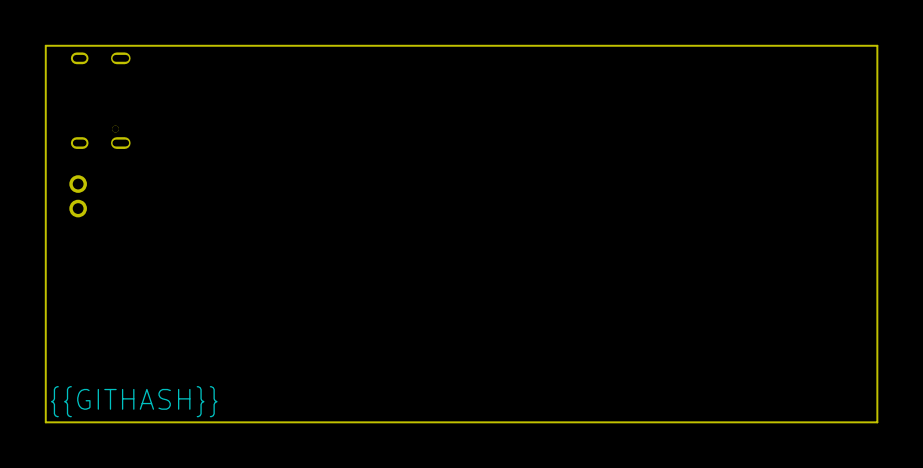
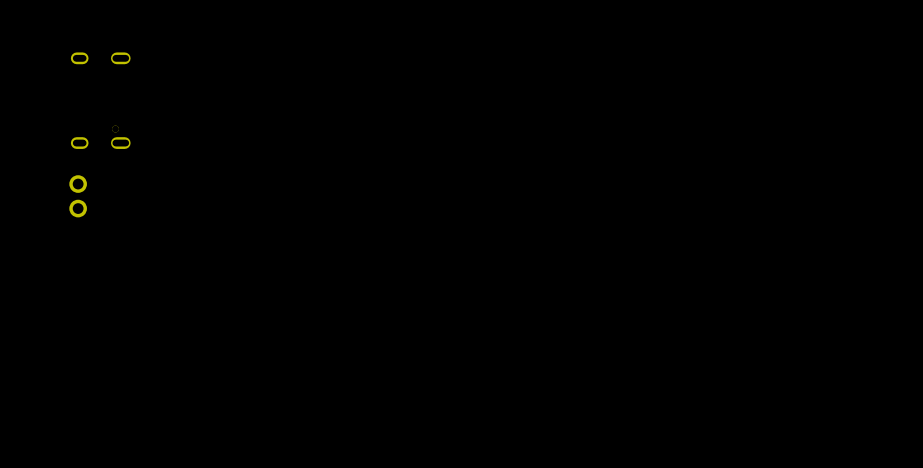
board edge: (877, 45) (45, 45) (45, 422) (877, 422) (877, 45) -> none
text: {{GITHASH}} (134, 401) -> none

